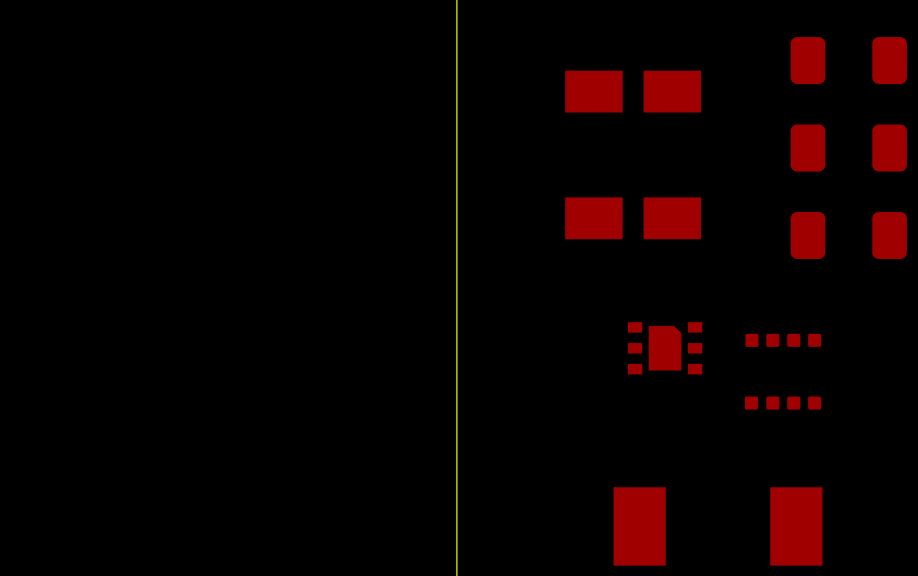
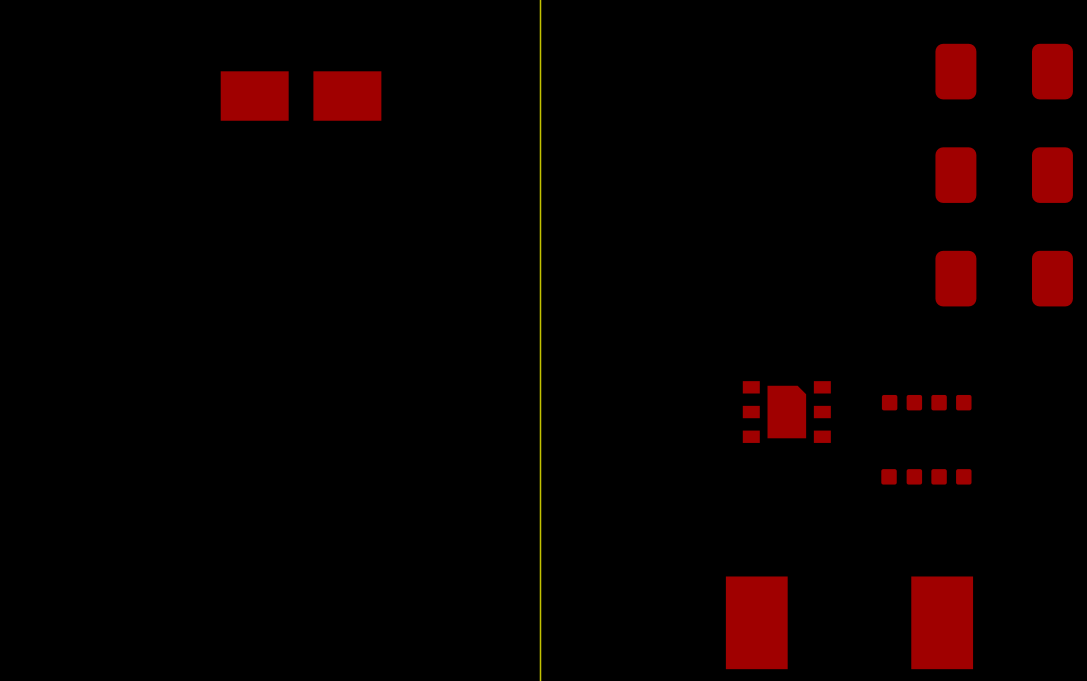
part: none -> (301, 96)
part: (633, 91) -> none
part: (633, 218) -> none

